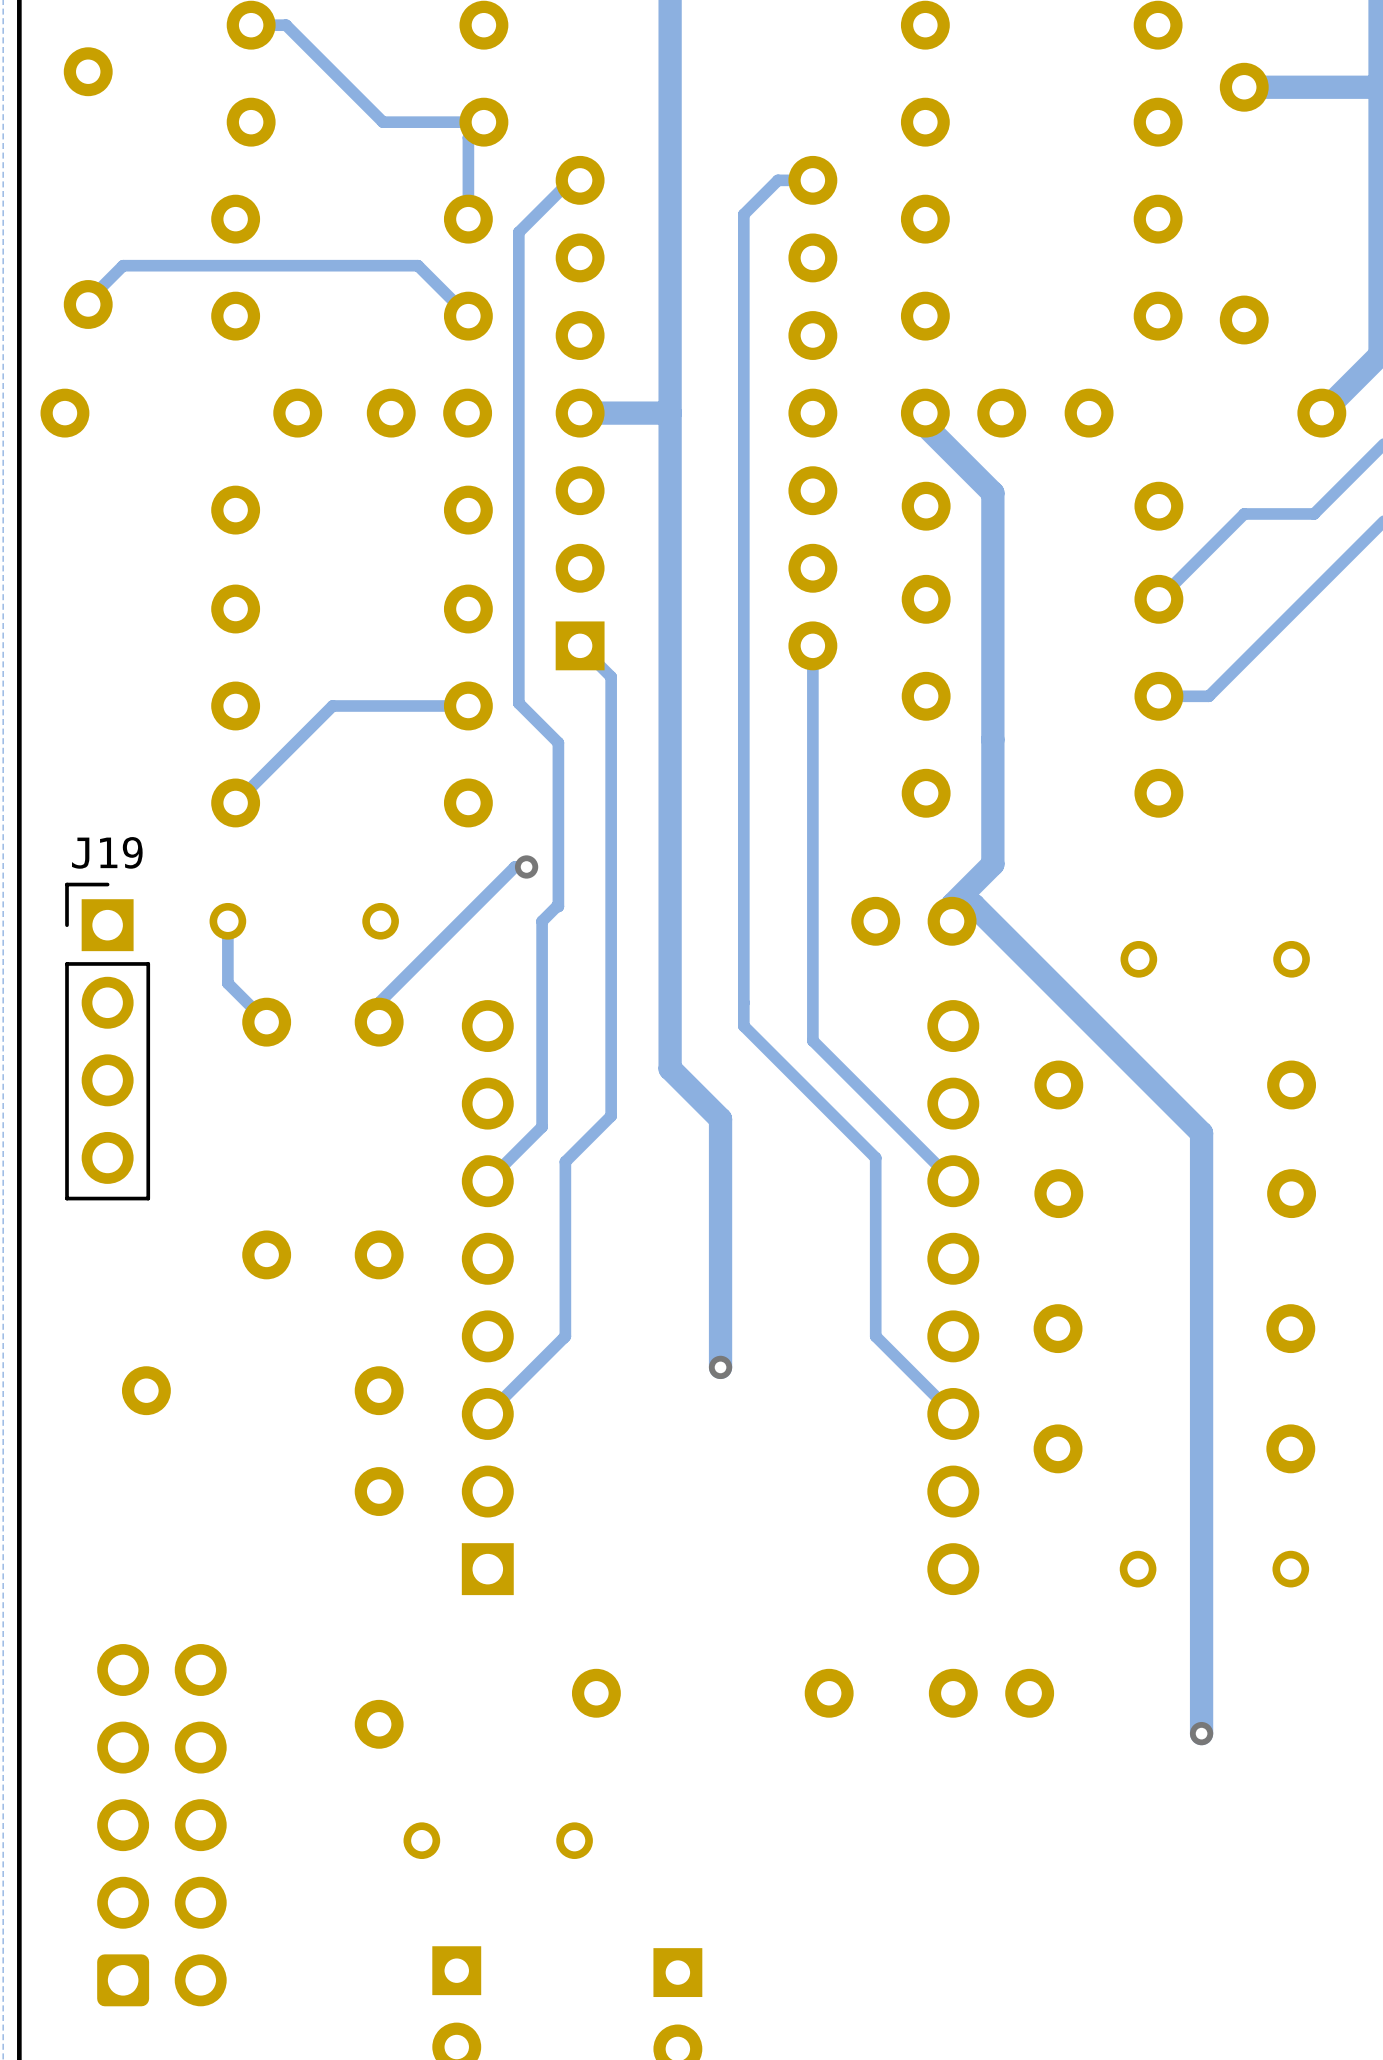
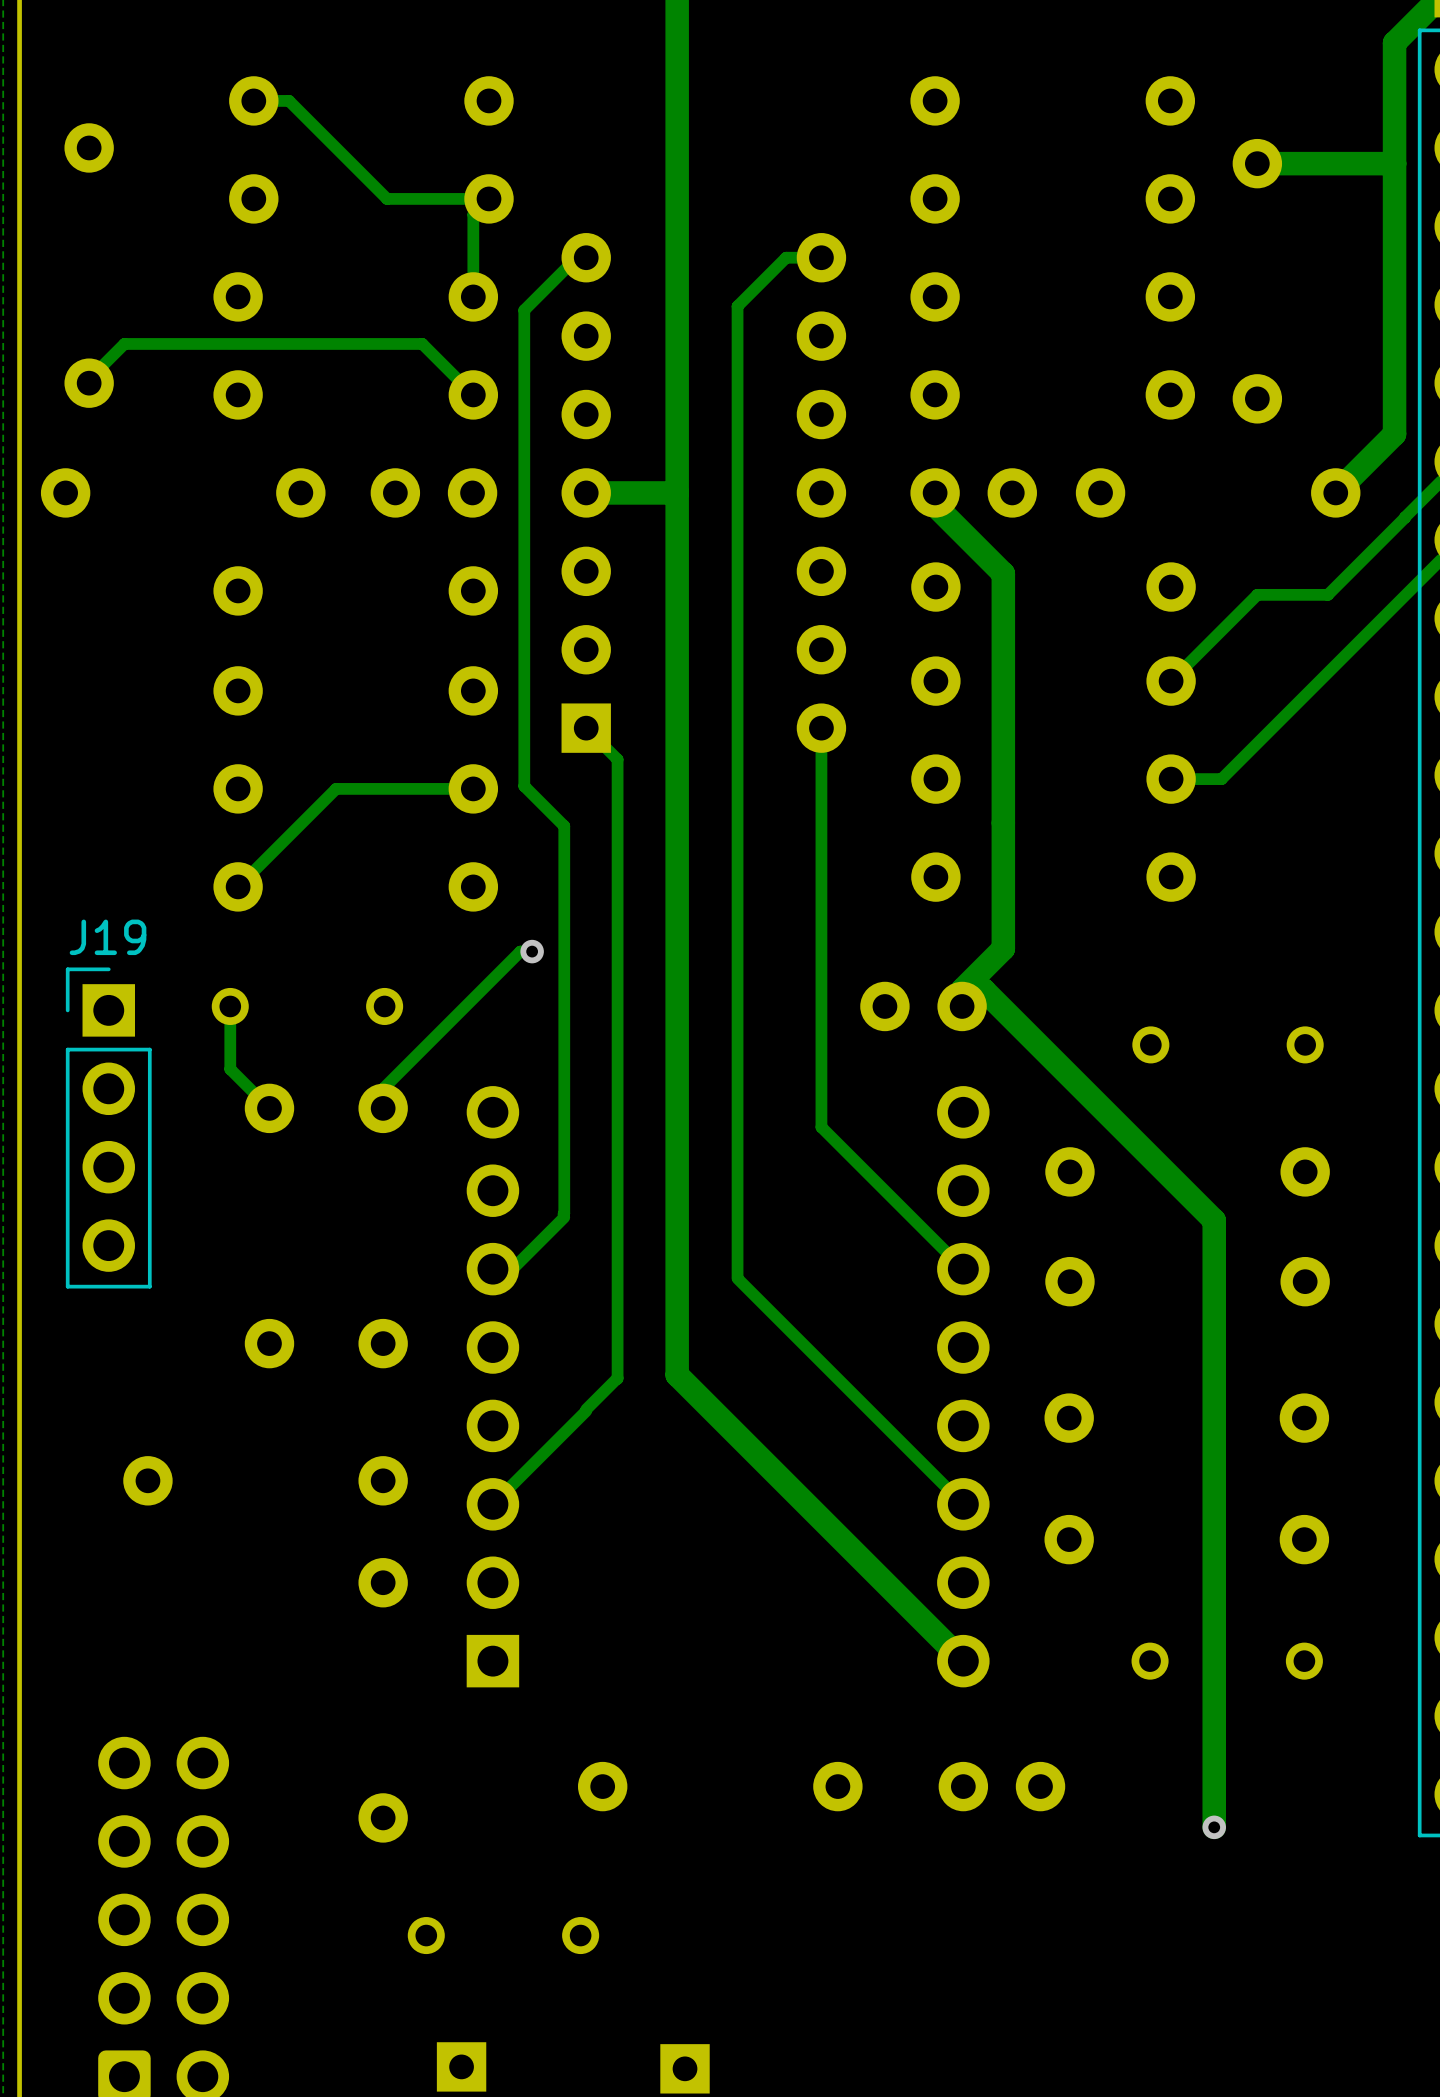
track: (743, 214) (743, 1026) (875, 1157) (875, 1336) -> (751, 292) (737, 306) (737, 1276)
track: (558, 906) (542, 921) (542, 1126) (487, 1181) -> (564, 991) (563, 1214)
track: (670, 1068) (720, 1119) (720, 1367) -> (677, 1155) (677, 1374) (963, 1661)
track: (611, 1116) (565, 1161) (565, 1336) -> (617, 1203) (617, 1378)
track: none -> (564, 1217) (512, 1269) (492, 1269)
track: none -> (737, 1278) (884, 1425)
track: none -> (617, 1378) (586, 1409)
track: none -> (586, 1411) (571, 1425)
via: (720, 1367) -> none

